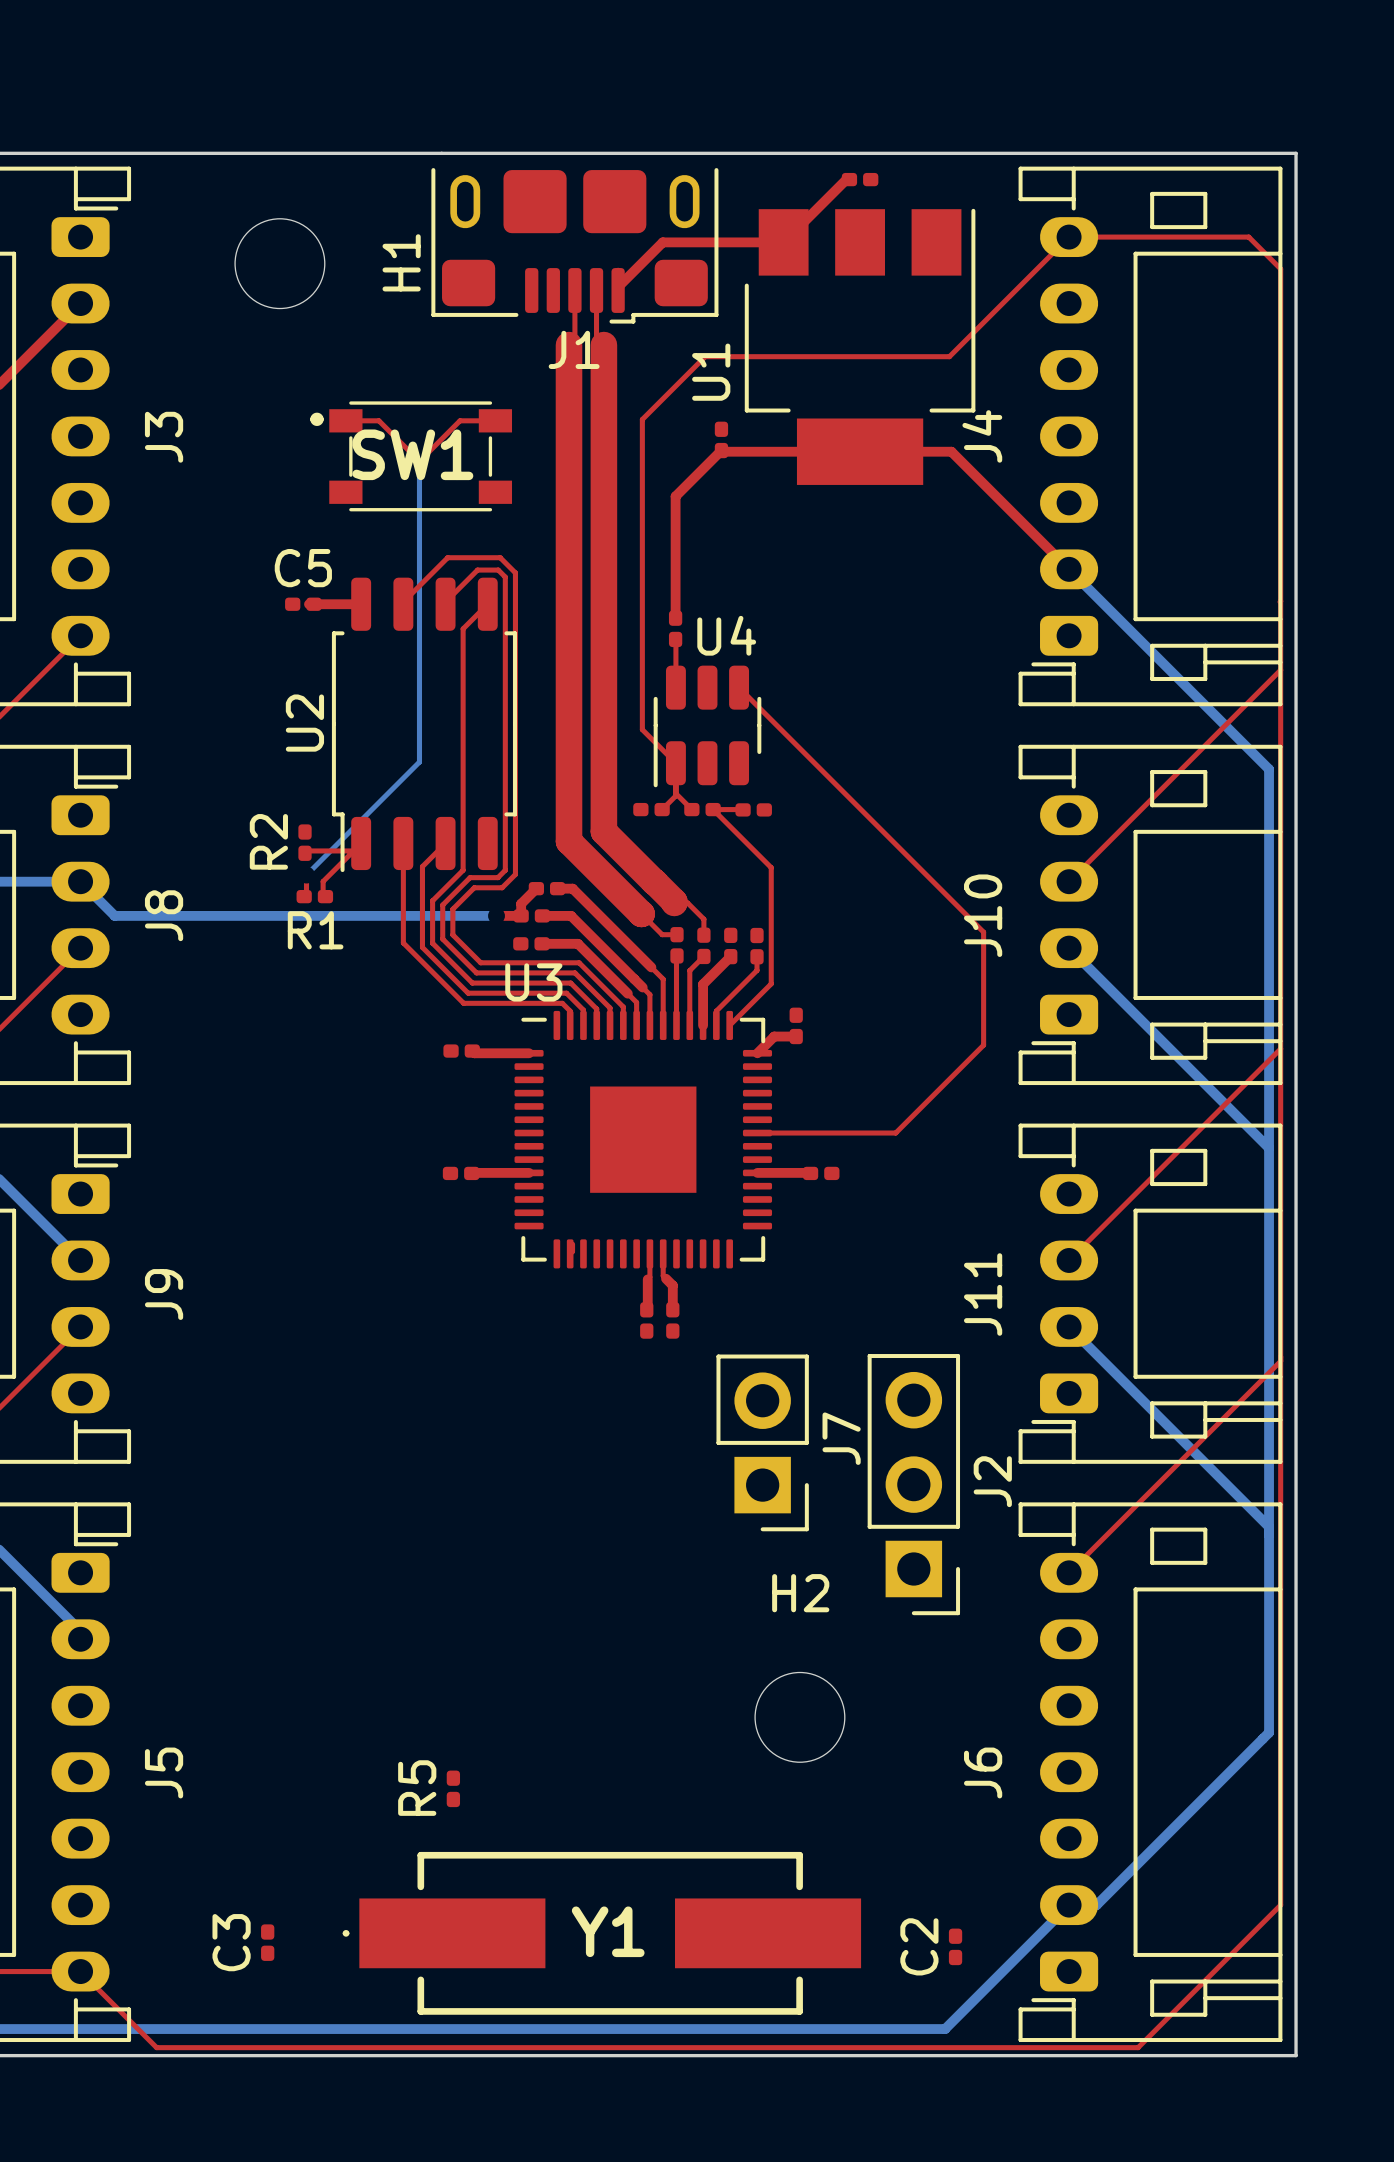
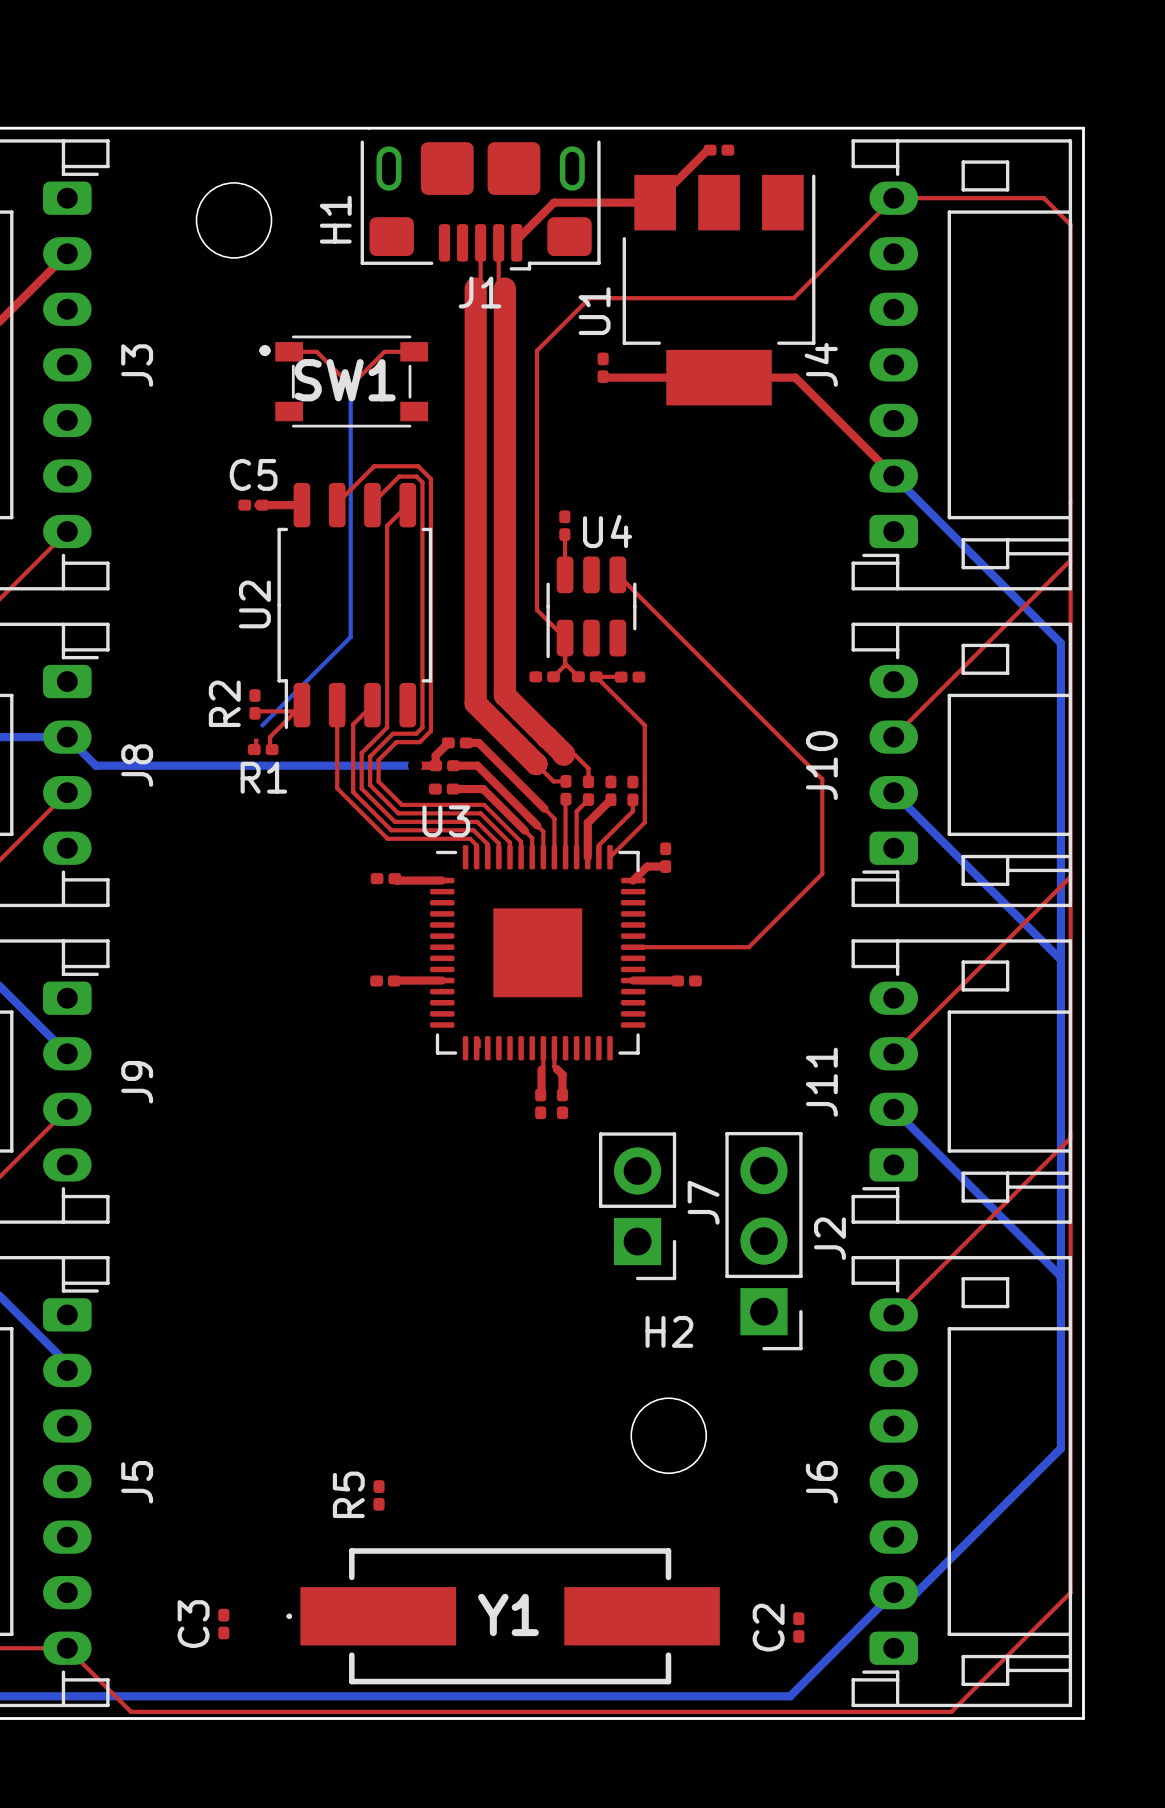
top track: (721, 450) (675, 496) (675, 618) -> none

